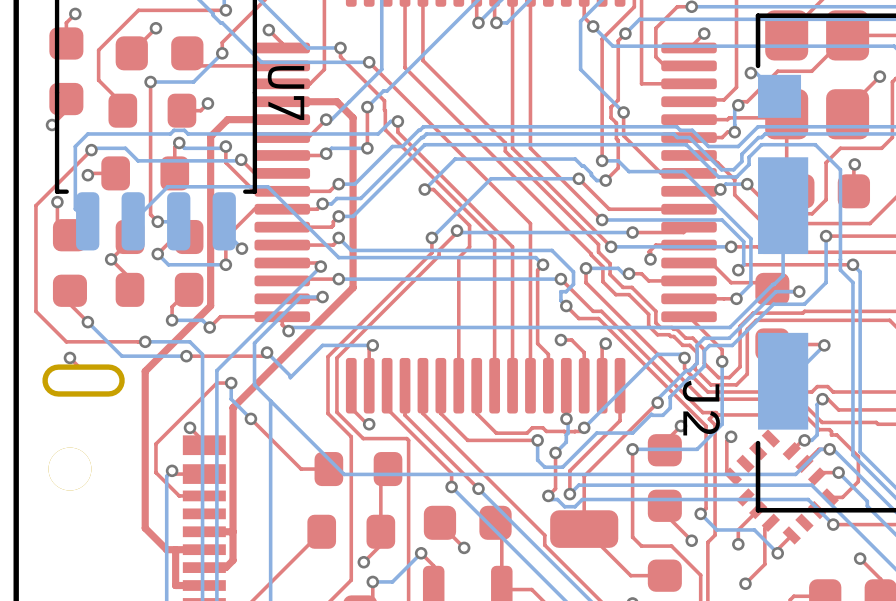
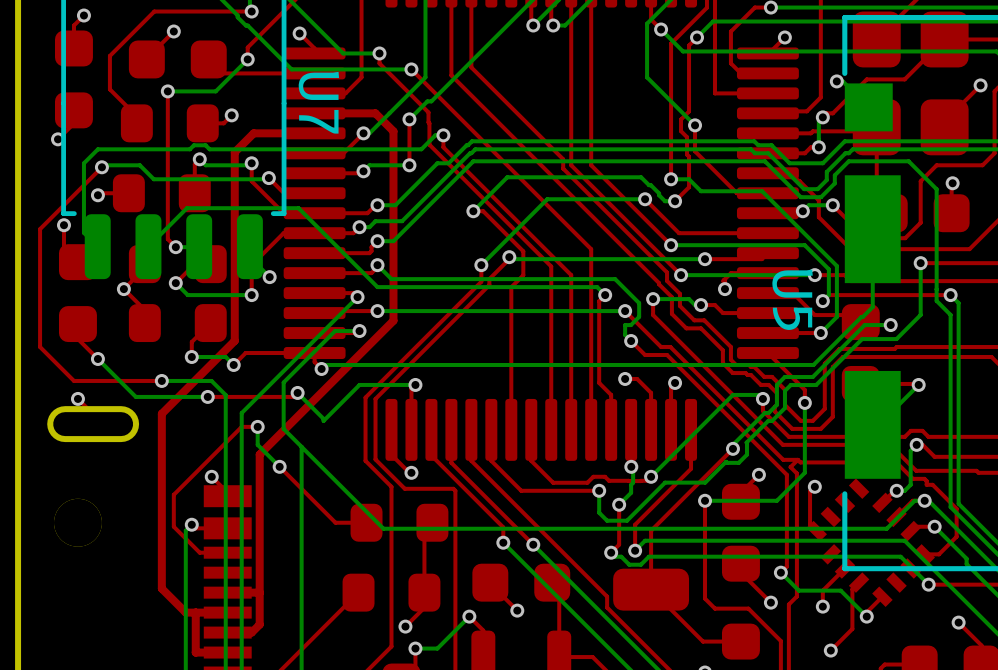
J2 name: J2 (701, 408) -> U5 (792, 299)

